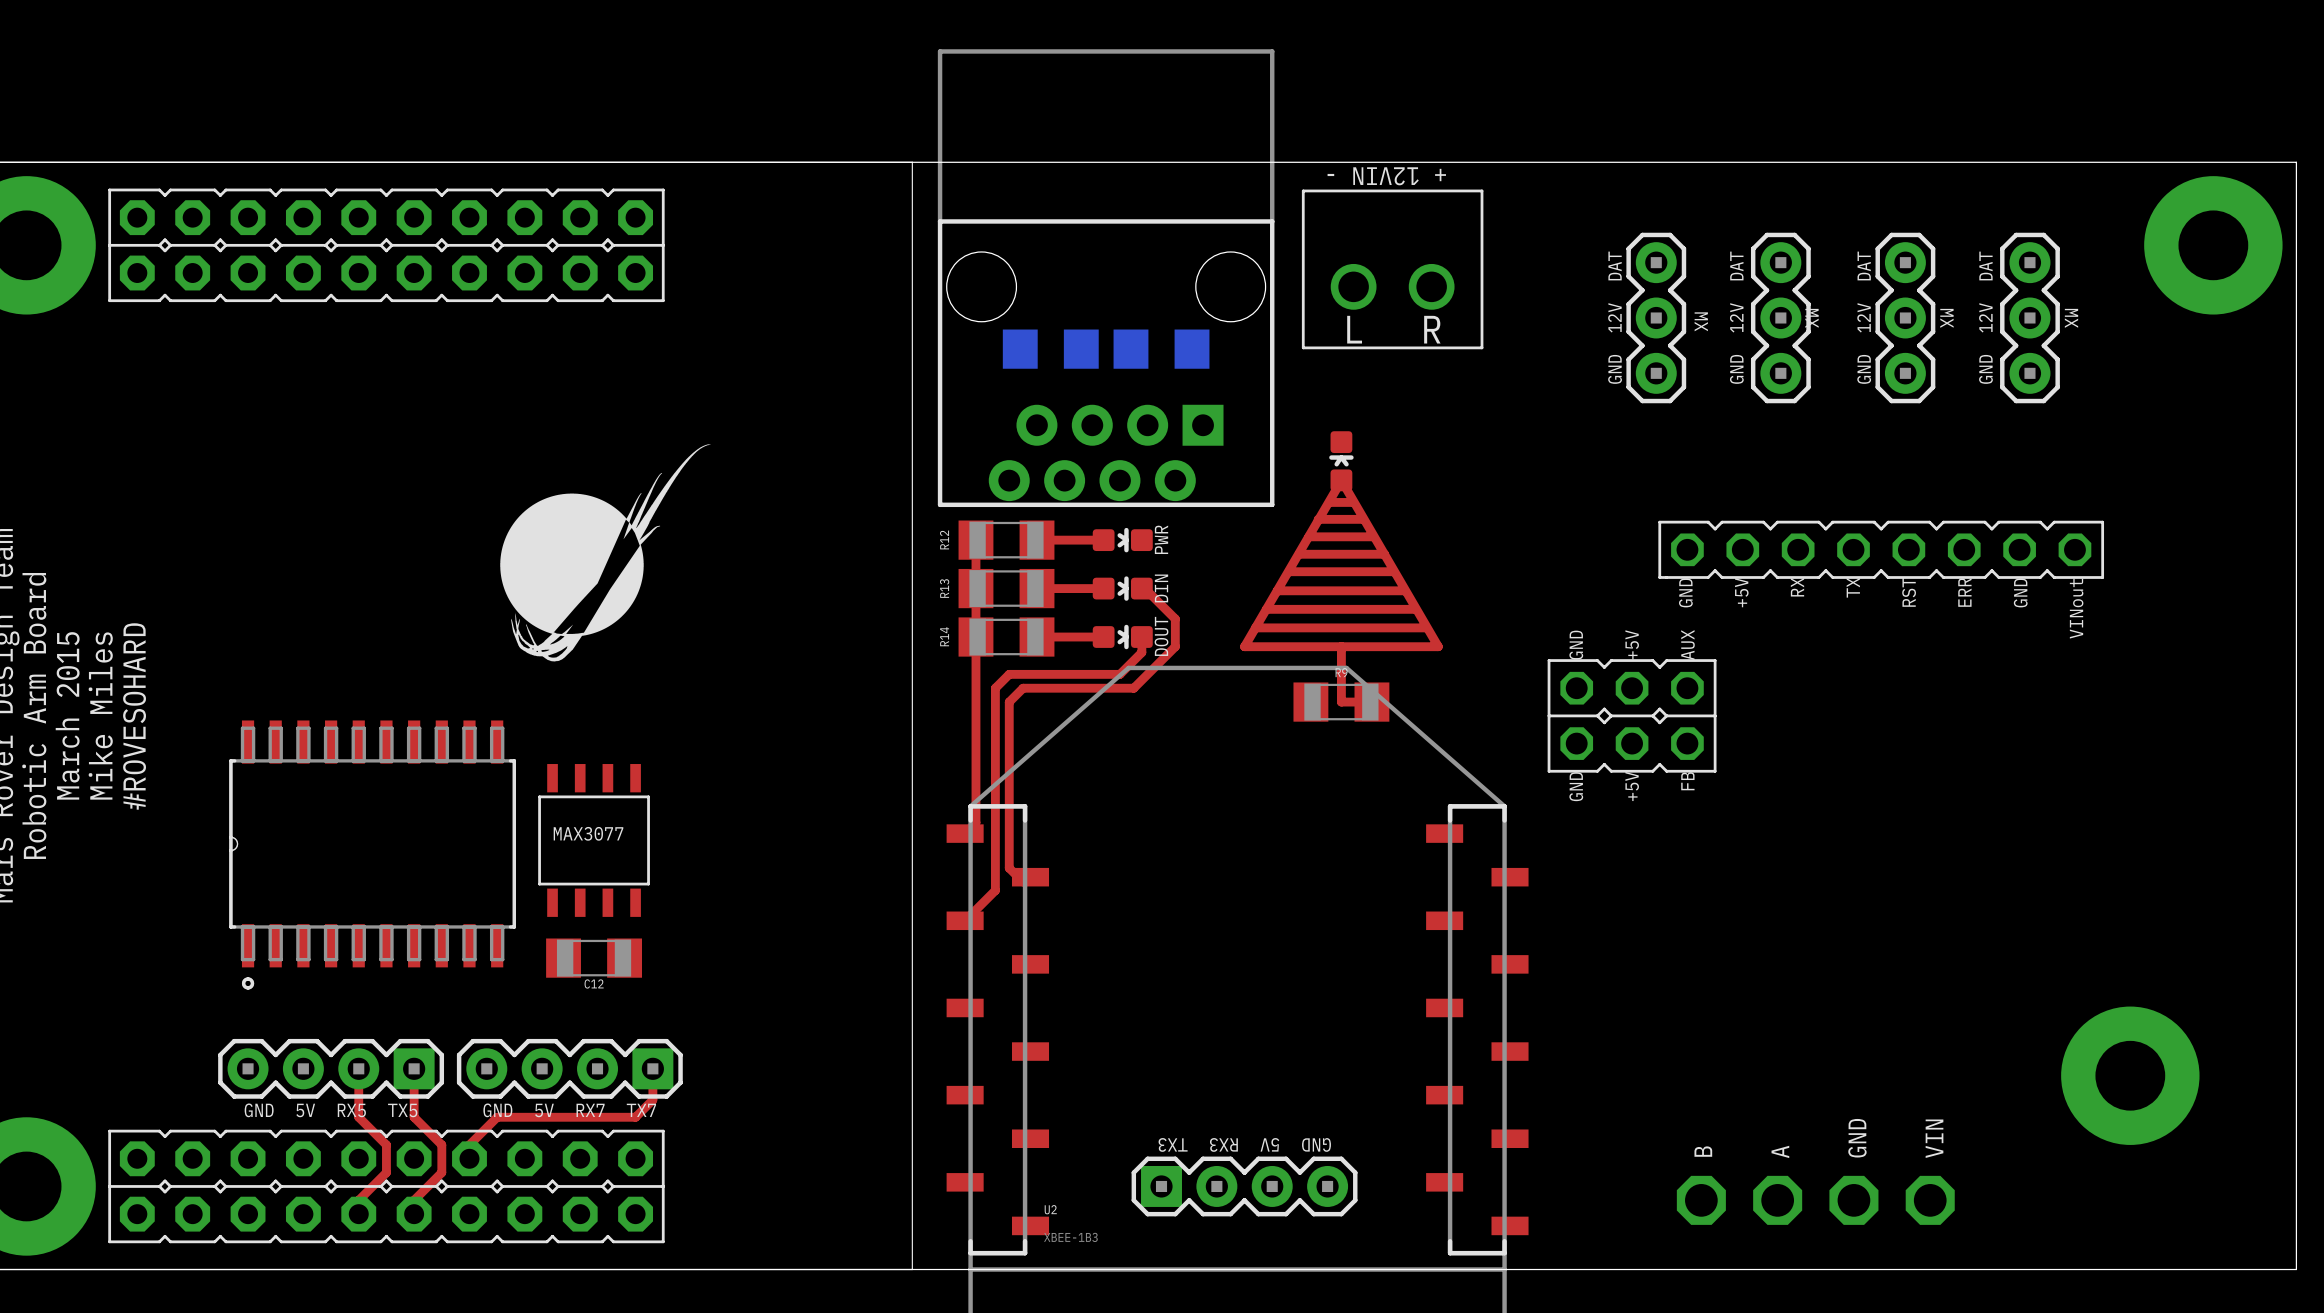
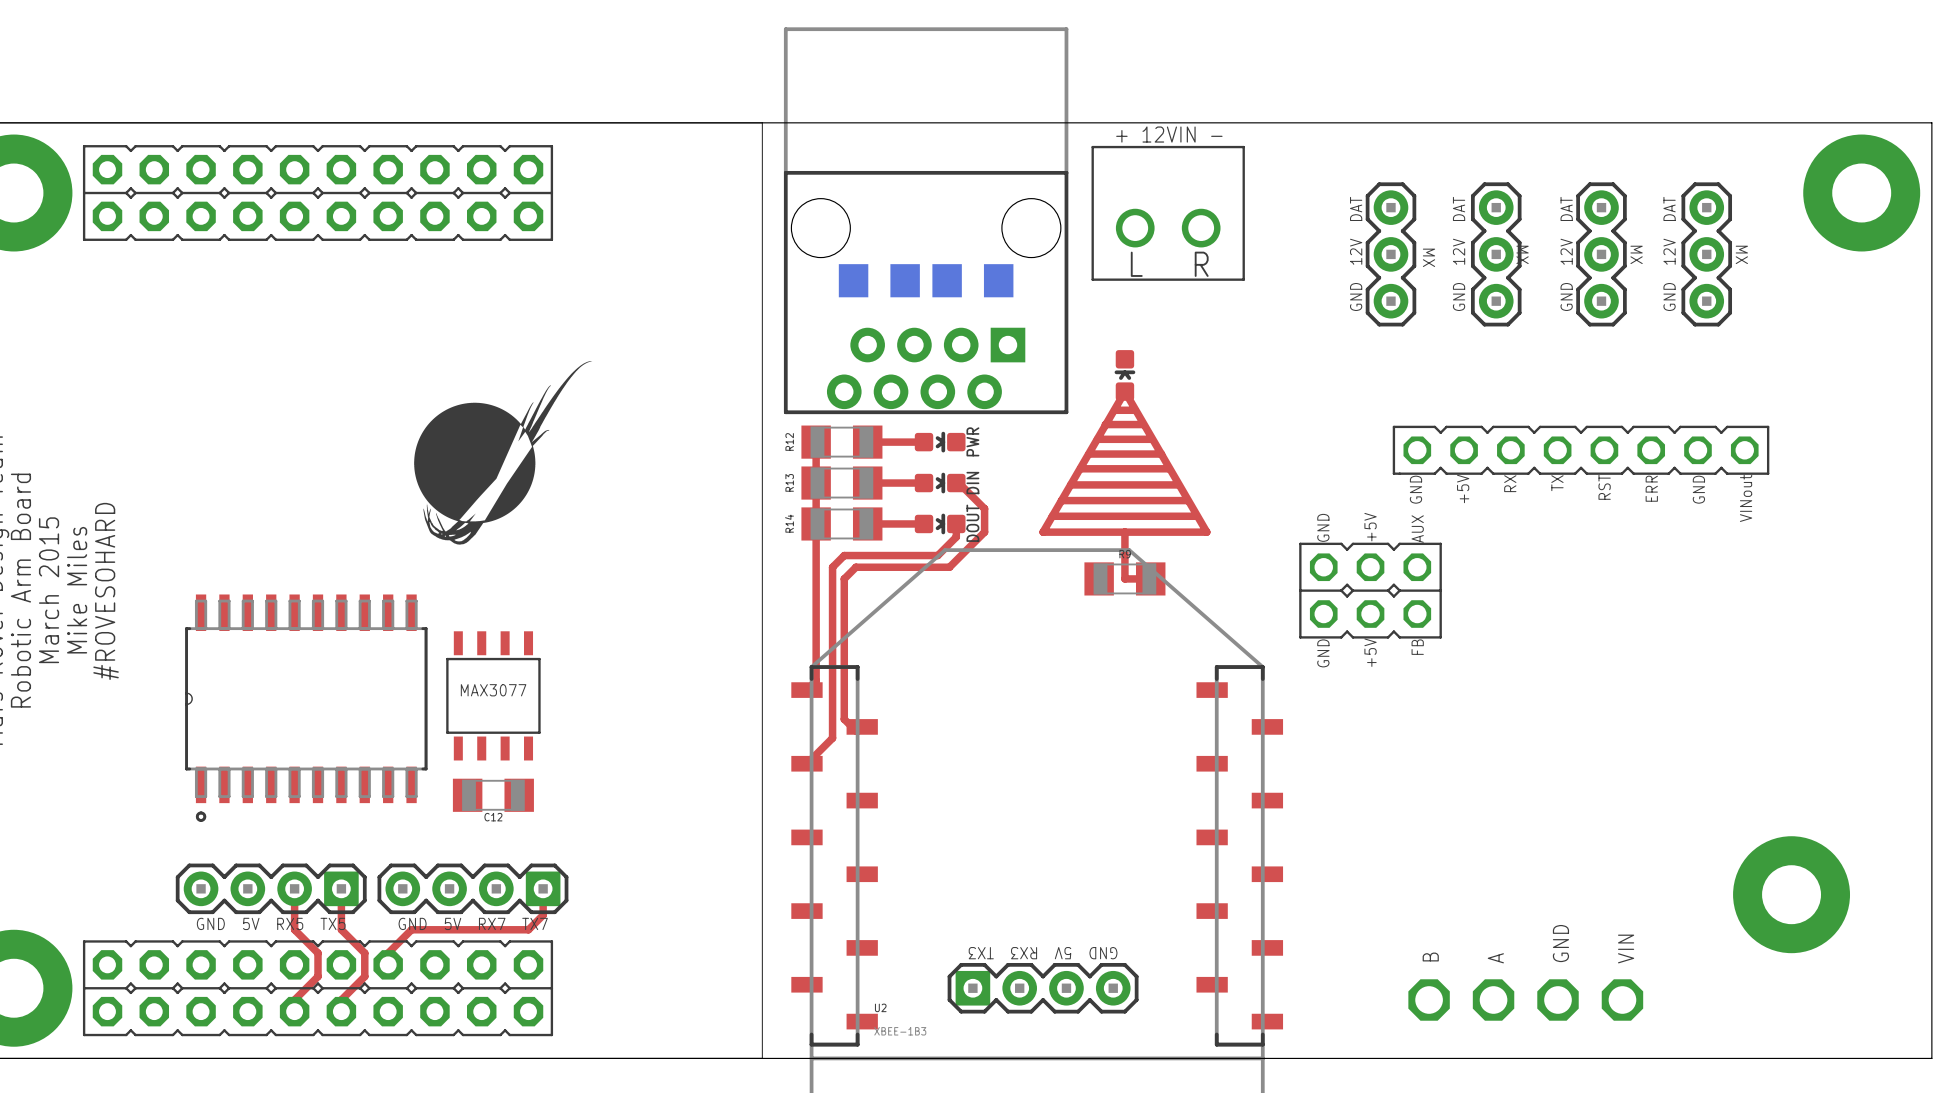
text rotation: 0° (1386, 176) -> 180° (1169, 134)

